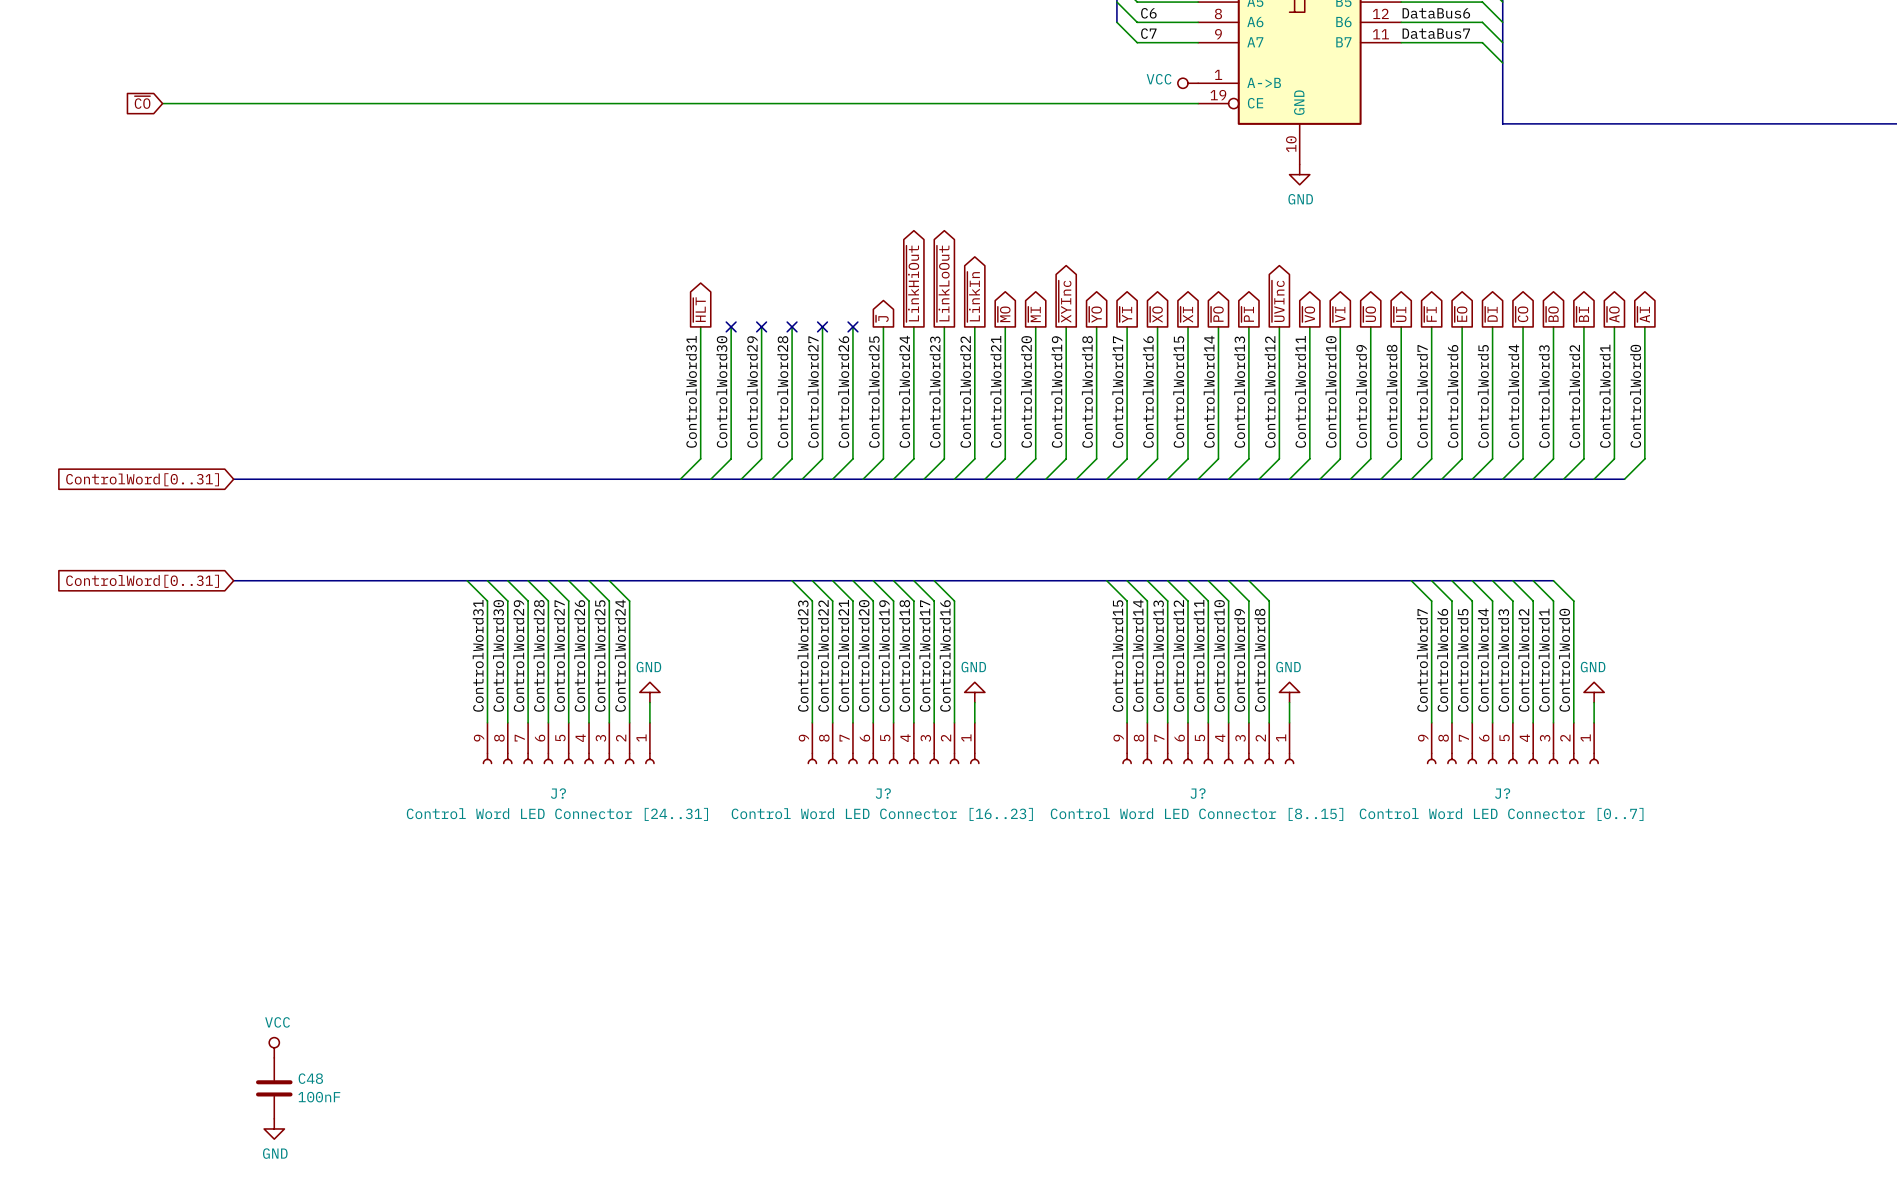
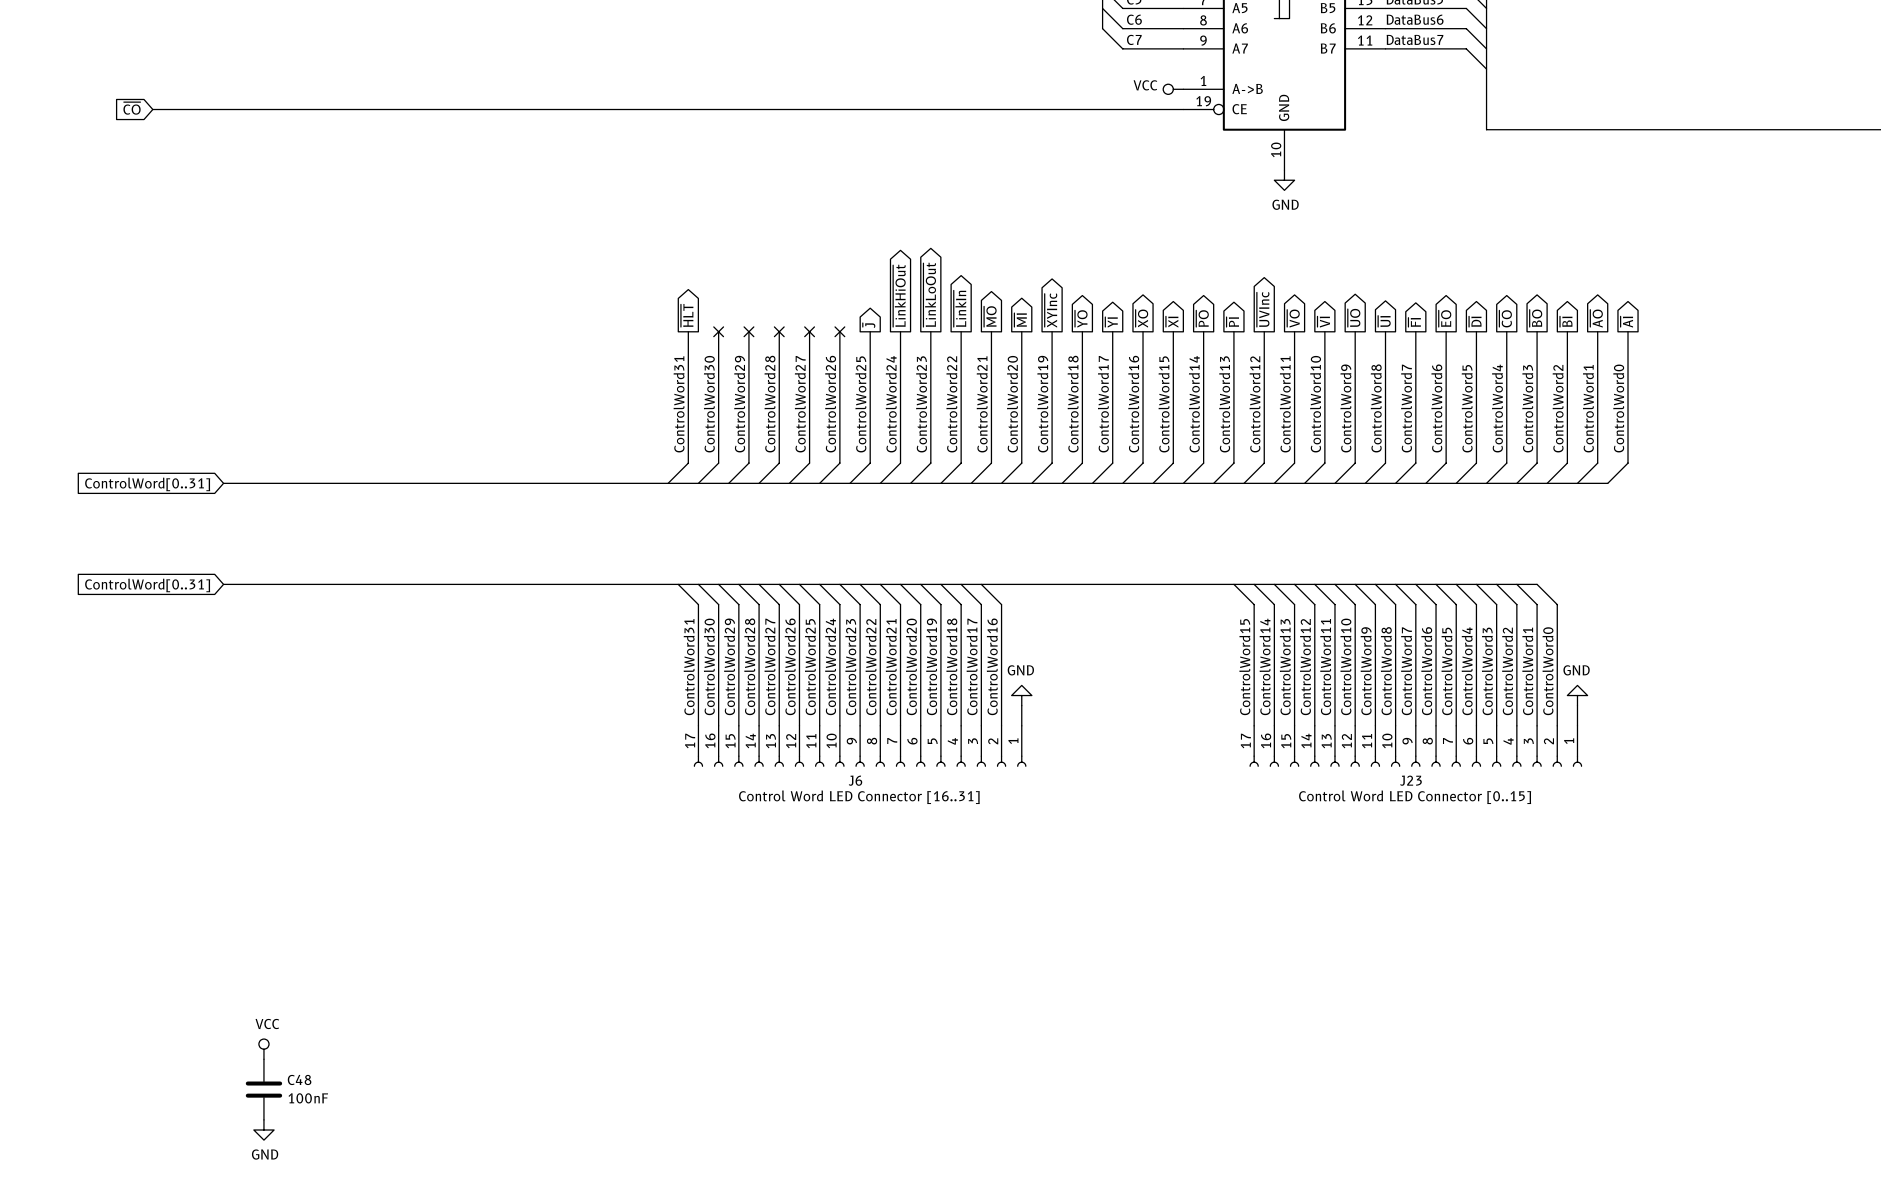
wire: (467, 580) (487, 601) (487, 722) -> none
wire: (487, 580) (507, 601) (507, 722) -> none
wire: (507, 580) (528, 601) (528, 722) -> none
wire: (528, 580) (548, 601) (548, 722) -> (678, 584) (698, 604) (698, 725)
wire: (548, 580) (568, 601) (568, 722) -> (698, 584) (718, 604) (718, 725)
wire: (568, 580) (589, 601) (589, 722) -> (718, 584) (738, 604) (738, 725)
wire: (589, 580) (609, 601) (609, 722) -> (738, 584) (759, 604) (759, 725)
wire: (609, 580) (629, 601) (629, 722) -> (759, 584) (779, 604) (779, 725)
wire: none -> (940, 584) (961, 604) (961, 705)
wire: none -> (981, 584) (1001, 604) (1001, 725)
wire: (1106, 580) (1127, 601) (1127, 722) -> (961, 584) (981, 604) (981, 725)
wire: (1127, 580) (1147, 601) (1147, 722) -> (1274, 584) (1294, 604) (1294, 725)
wire: (1147, 580) (1167, 601) (1167, 722) -> (1294, 584) (1314, 604) (1314, 725)
wire: (1167, 580) (1188, 601) (1188, 722) -> (1314, 584) (1334, 604) (1334, 725)
wire: (1188, 580) (1208, 601) (1208, 722) -> (1334, 584) (1355, 604) (1355, 725)
wire: (1208, 580) (1228, 601) (1228, 722) -> (1355, 584) (1375, 604) (1375, 725)
wire: (1228, 580) (1248, 601) (1248, 722) -> (1375, 584) (1395, 604) (1395, 725)
wire: none -> (1254, 584) (1274, 604) (1274, 705)
label: ControlWord31 (478, 655) -> none
label: ControlWord30 (498, 655) -> none
label: ControlWord29 (518, 655) -> none
label: ControlWord28 (539, 655) -> none
label: ControlWord27 (559, 655) -> none
label: ControlWord26 (579, 655) -> none
label: ControlWord25 (600, 655) -> none
label: ControlWord24 (620, 655) -> none
label: none -> ControlWord31 (689, 667)
label: none -> ControlWord30 (709, 666)
label: none -> ControlWord29 (729, 666)
label: none -> ControlWord28 (749, 666)
label: none -> ControlWord27 (769, 666)
label: ControlWord22 (823, 655) -> ControlWord25 (810, 667)
label: ControlWord21 (843, 655) -> ControlWord24 (830, 666)
label: ControlWord20 (864, 655) -> ControlWord23 (850, 667)
label: ControlWord19 (884, 655) -> ControlWord22 (871, 667)
label: ControlWord18 (904, 655) -> ControlWord21 (891, 667)
label: ControlWord17 (924, 655) -> ControlWord20 (911, 666)
label: ControlWord16 (945, 655) -> ControlWord19 (931, 666)
label: none -> ControlWord18 (951, 666)
label: none -> ControlWord17 (972, 666)
label: none -> ControlWord16 (992, 666)
label: ControlWord15 (1117, 655) -> none
label position: ControlWord14 (1138, 655) -> ControlWord14 (1265, 666)
label position: ControlWord12 (1178, 655) -> ControlWord12 (1305, 667)
label position: ControlWord11 (1199, 655) -> ControlWord11 (1325, 667)
label position: ControlWord10 (1219, 655) -> ControlWord10 (1345, 666)
label: ControlWord23 (803, 656) -> ControlWord26 (790, 666)
label position: ControlWord13 (1158, 656) -> ControlWord13 (1285, 667)
label position: ControlWord9 (1239, 660) -> ControlWord9 (1366, 671)
label: ControlWord8 (1259, 660) -> ControlWord15 (1244, 667)
label: none -> ControlWord8 (1386, 671)
power symbol: GND (649, 692) -> none
power symbol position: GND (974, 692) -> GND (1021, 695)
power symbol: GND (1289, 692) -> none
wire: (649, 702) (649, 722) -> none
wire: none -> (1021, 705) (1021, 725)
J?: Control Word LED Connector [24..31] (568, 743) -> none
J6: none -> Control Word LED Connector [16..31] (860, 746)
J?: Control Word LED Connector [16..23] (893, 743) -> none
J?: Control Word LED Connector [8..15] (1208, 743) -> none
J23: none -> Control Word LED Connector [0..15] (1415, 746)
J?: Control Word LED Connector [0..7] (1512, 743) -> none

